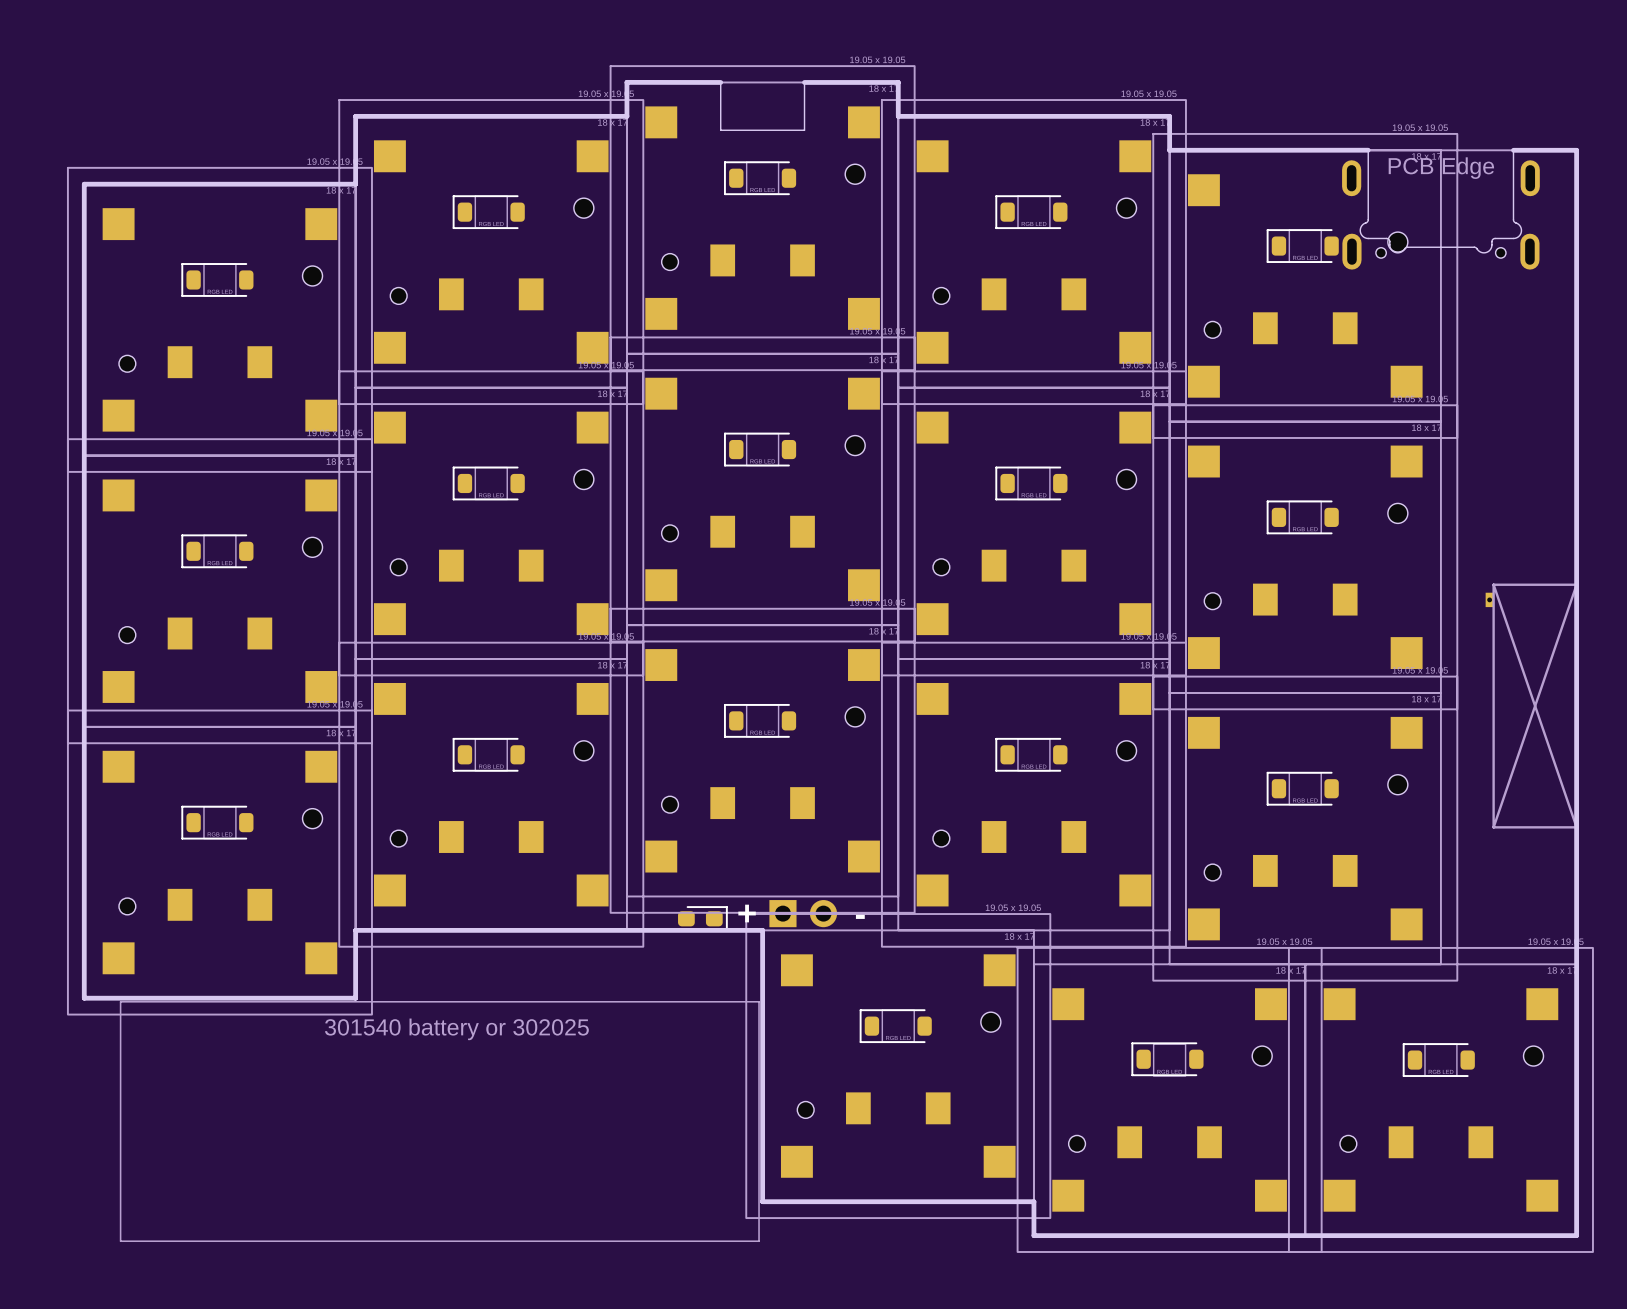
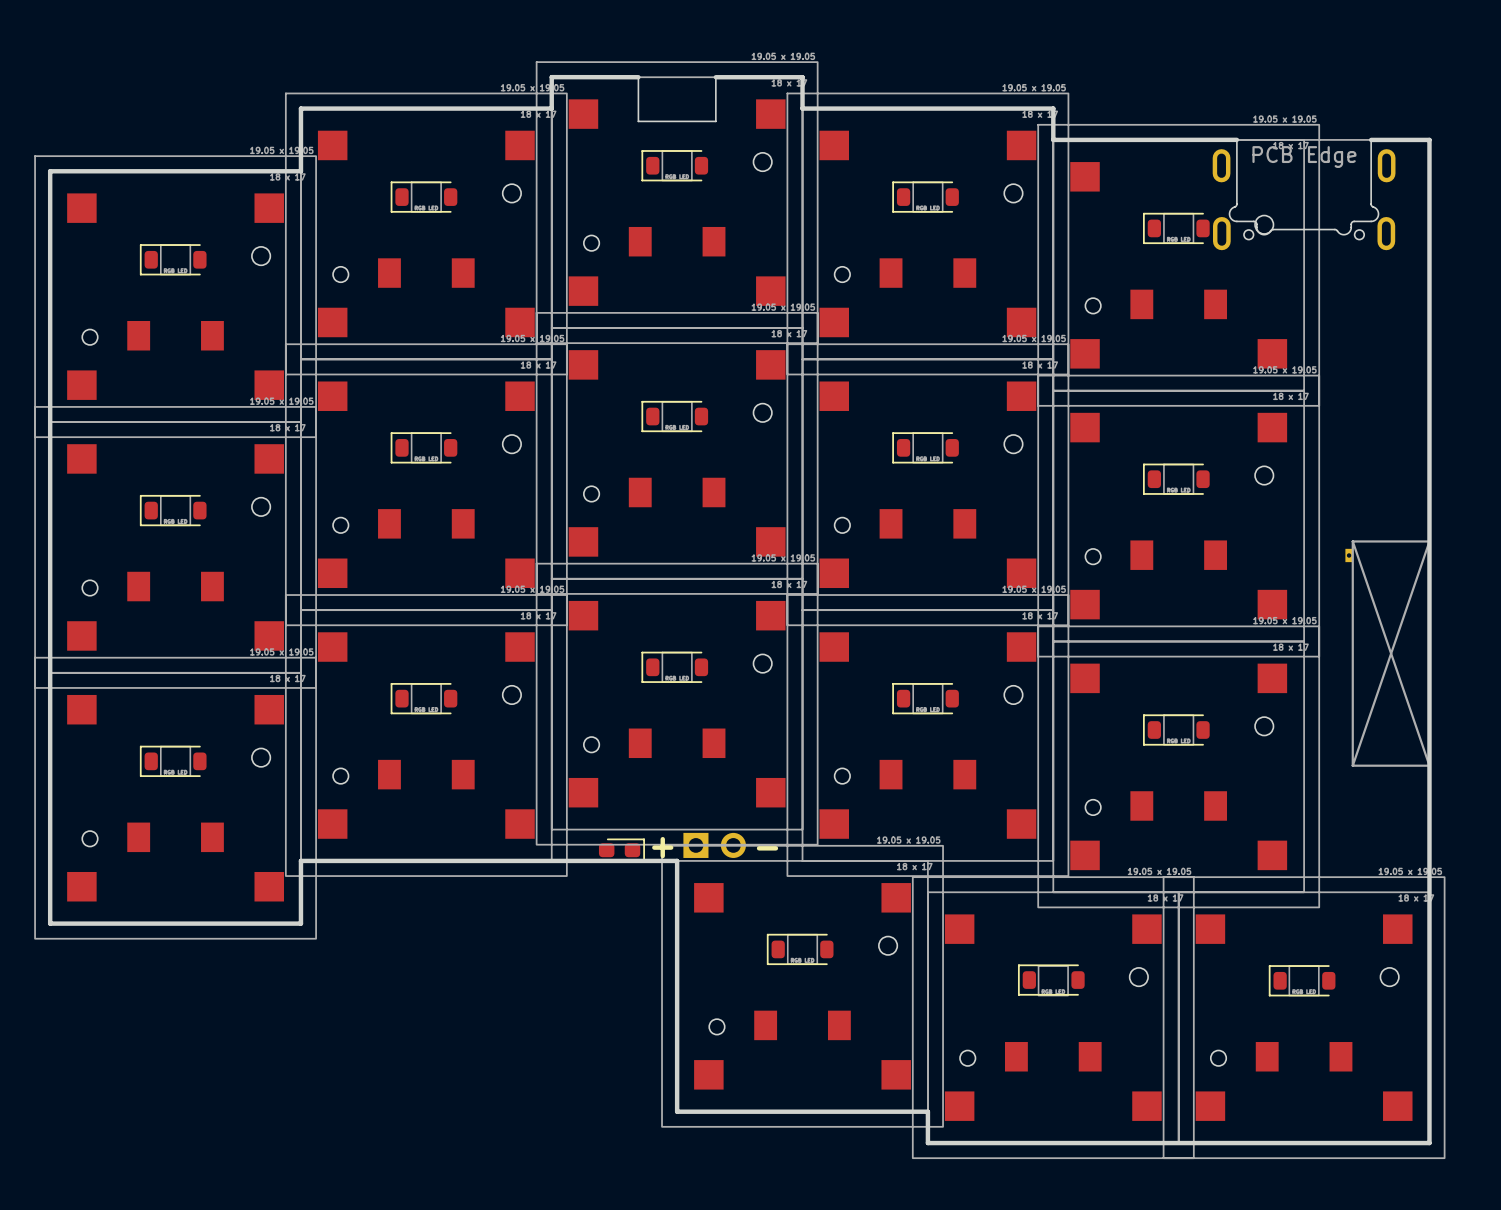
line: (120, 1001) (759, 1001) (759, 1241) (120, 1241) (120, 1001) -> none
text: 301540 battery or 302025 (456, 1029) -> none

